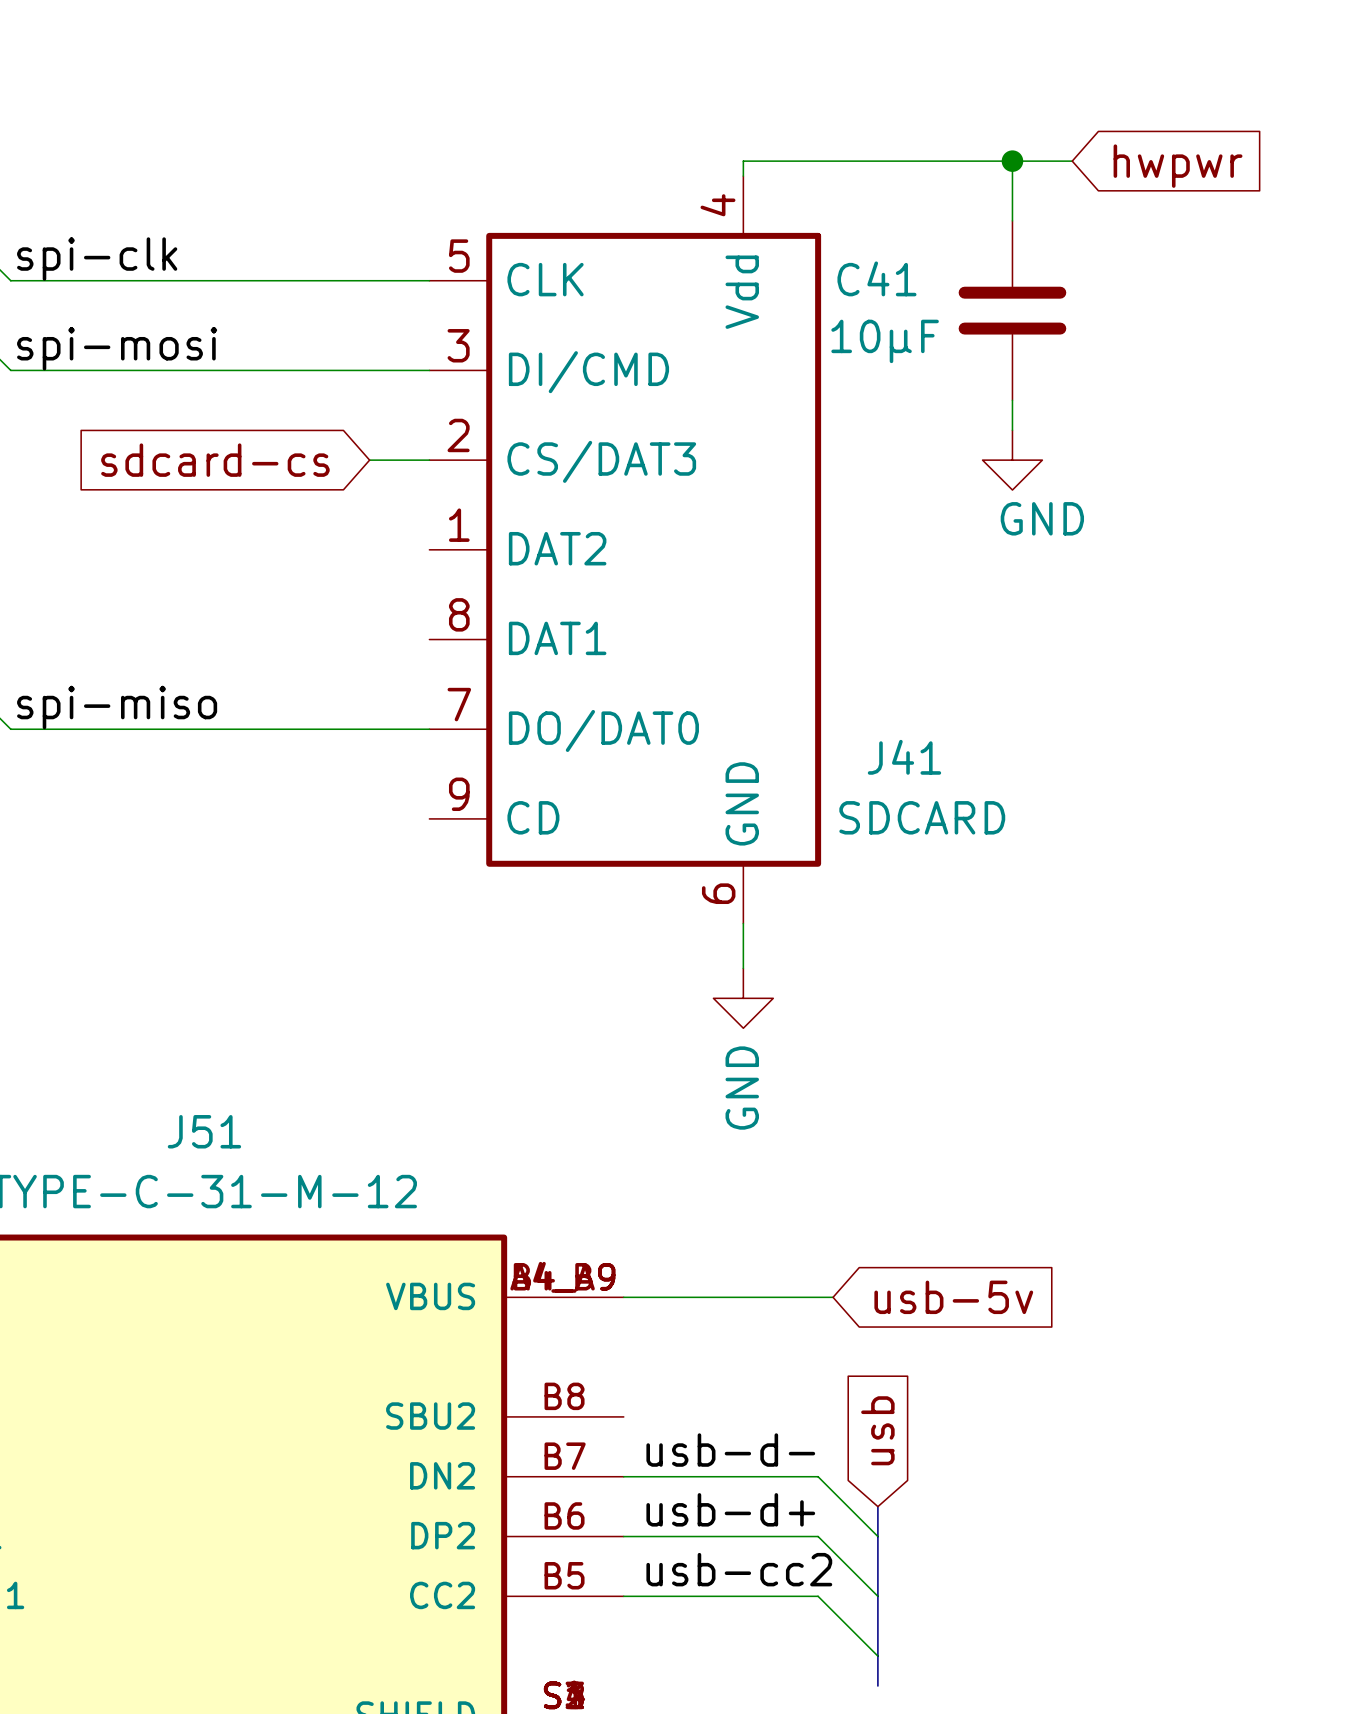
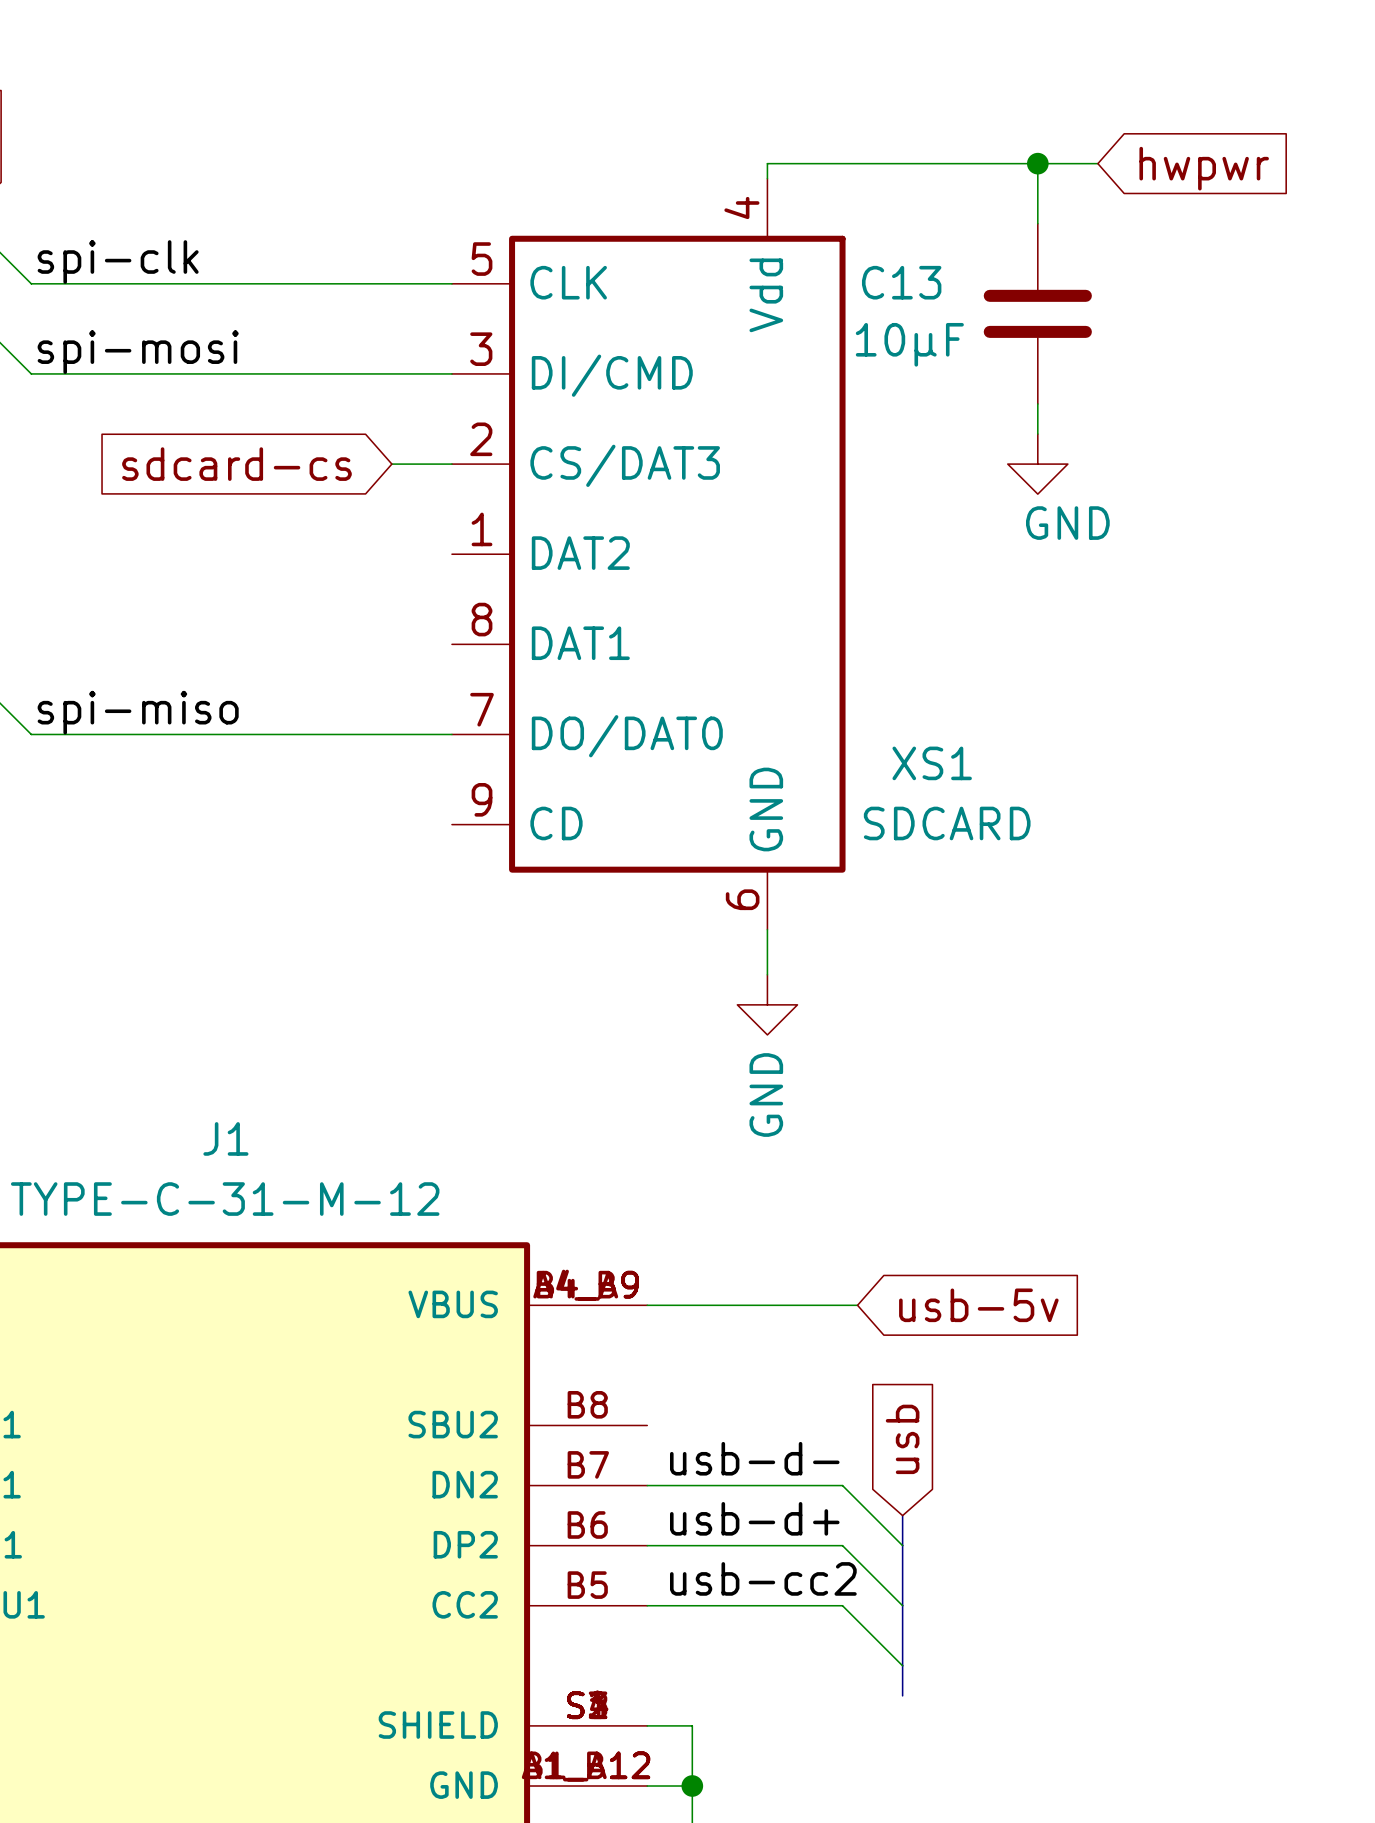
C41 name: C41 (876, 278) -> C13 (901, 282)
J41 name: J41 (904, 757) -> XS1 (932, 763)
J51 name: J51 (204, 1131) -> J1 (225, 1138)

